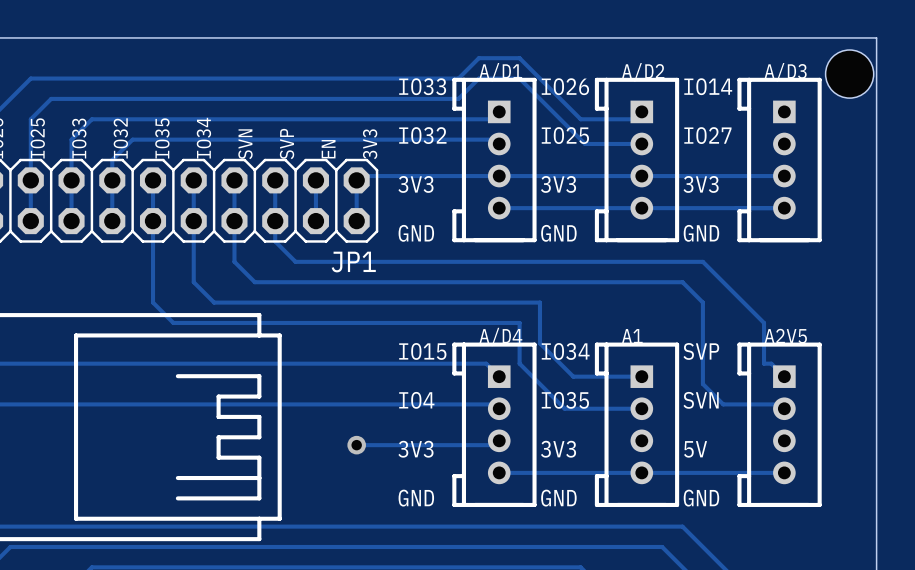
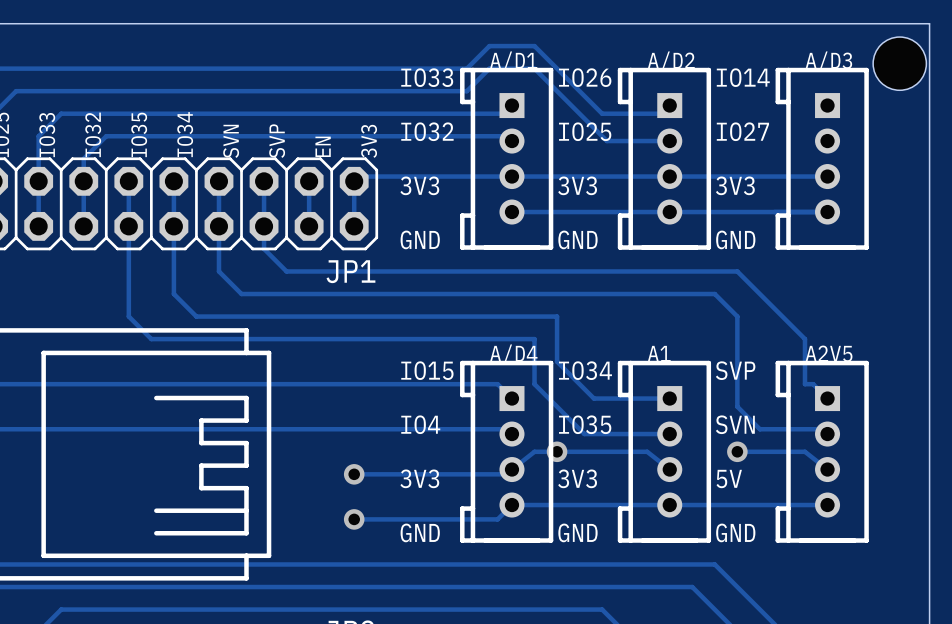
via: none -> (557, 451)
track: none -> (737, 451) (804, 451) (827, 469)
via: none -> (737, 451)
track: none -> (511, 469) (534, 451) (647, 451) (669, 469)
track: none -> (511, 505) (497, 519) (354, 519)
via: none -> (354, 519)

